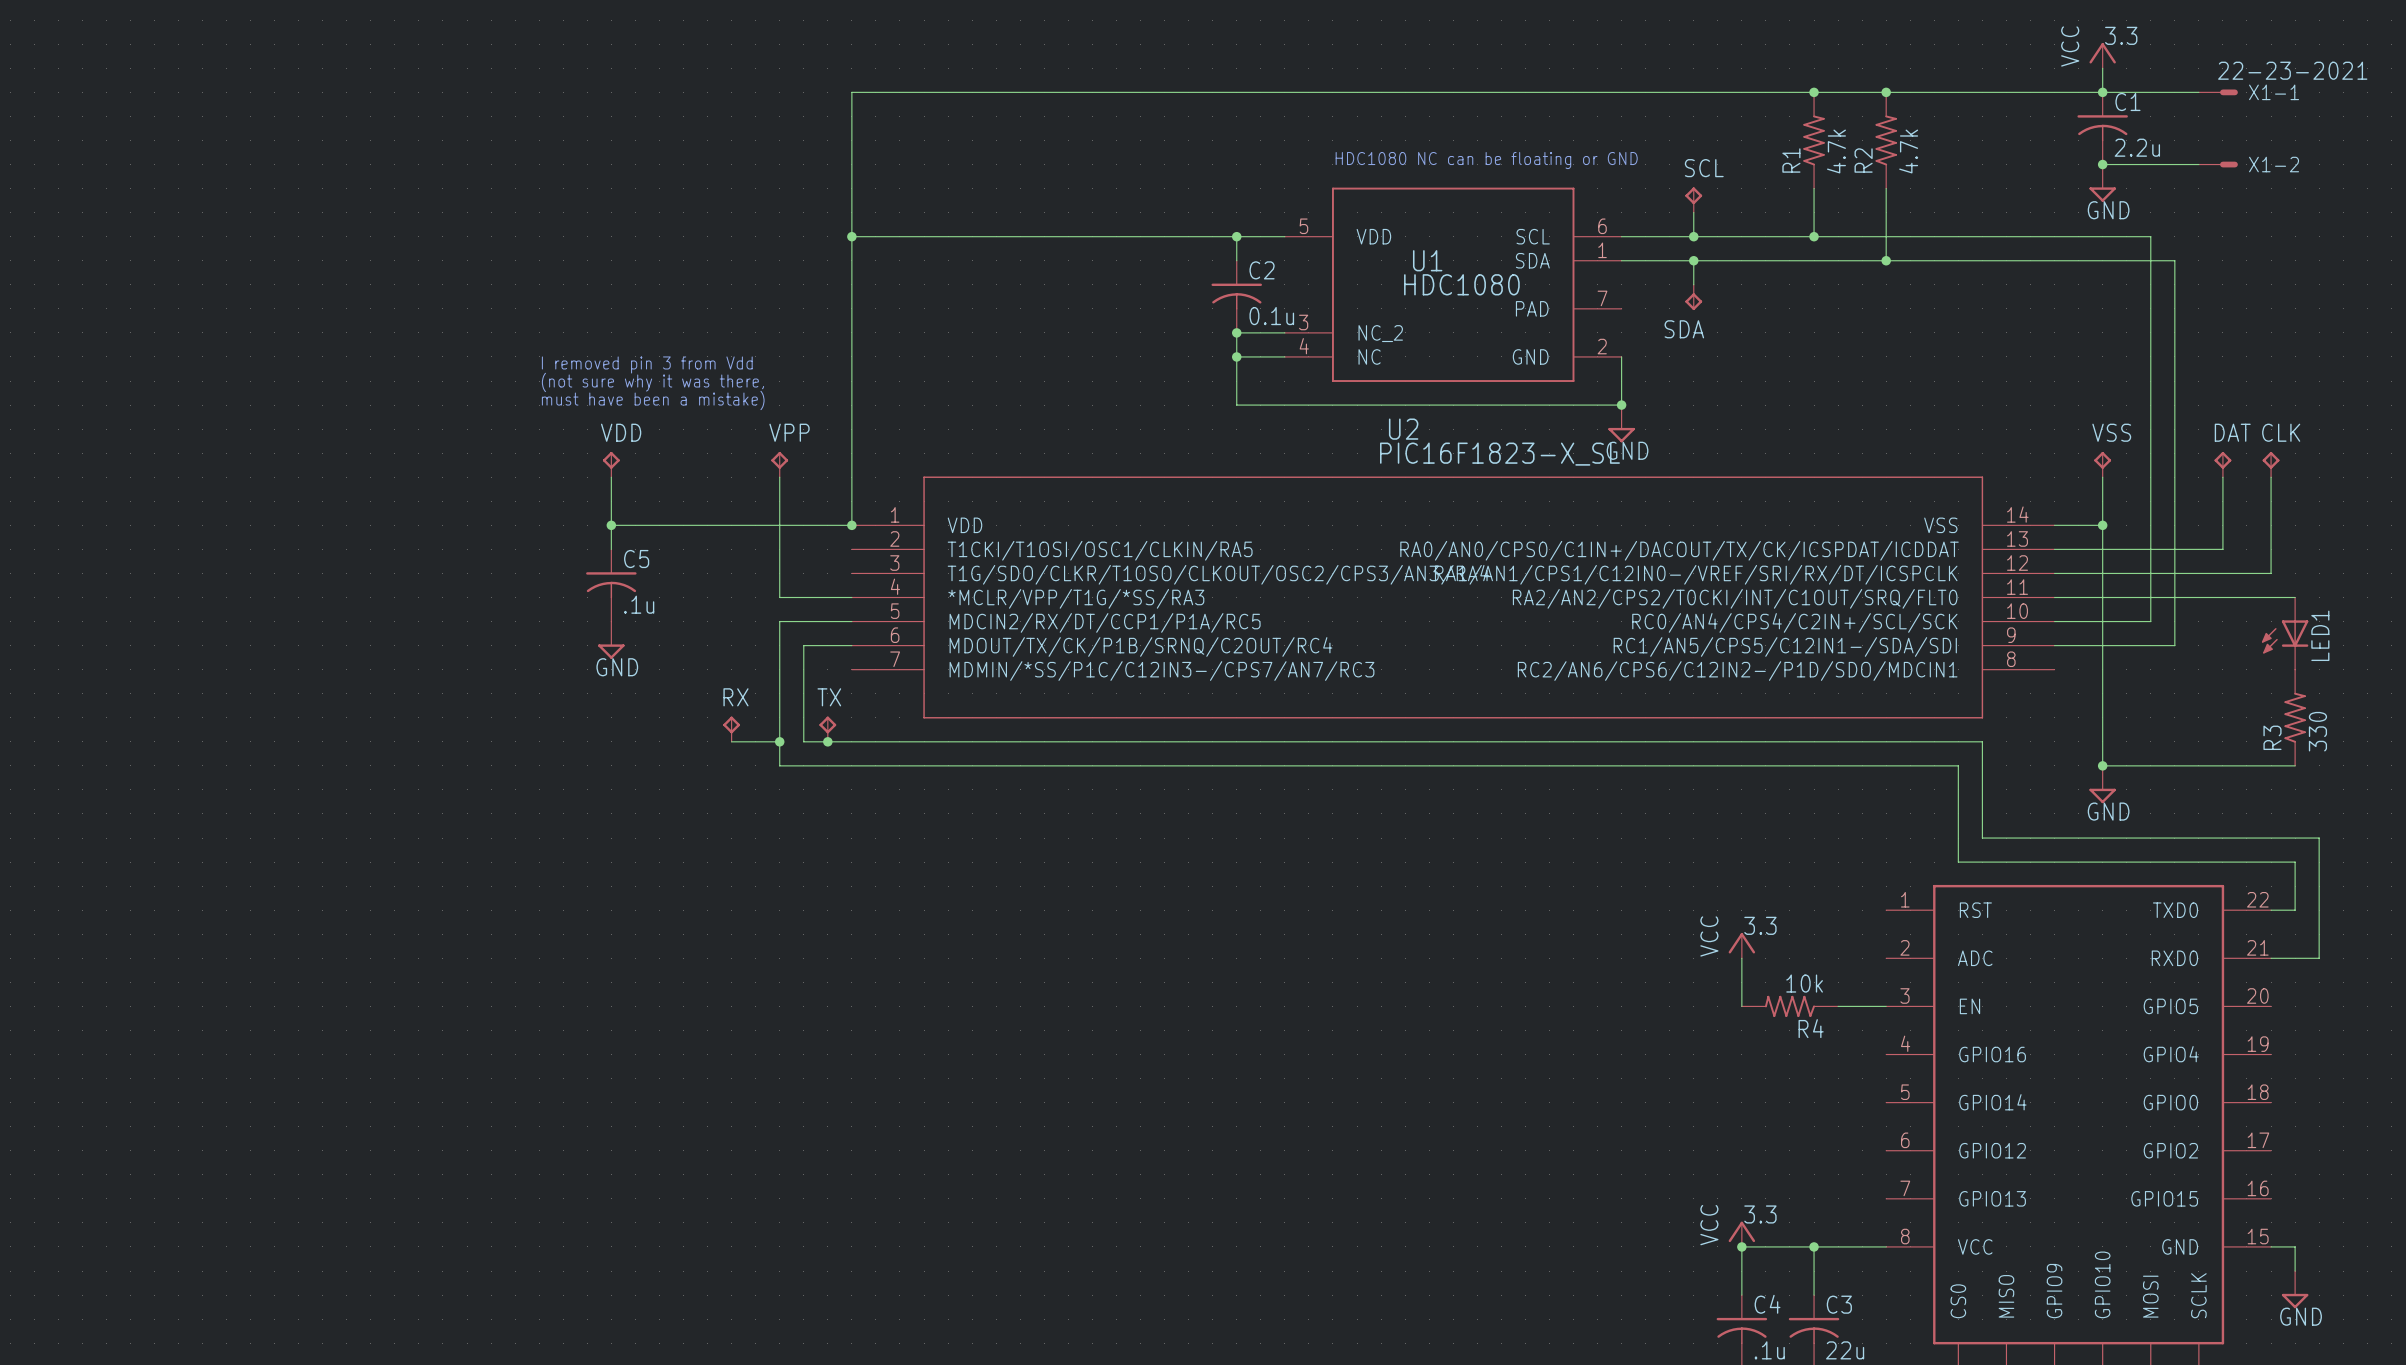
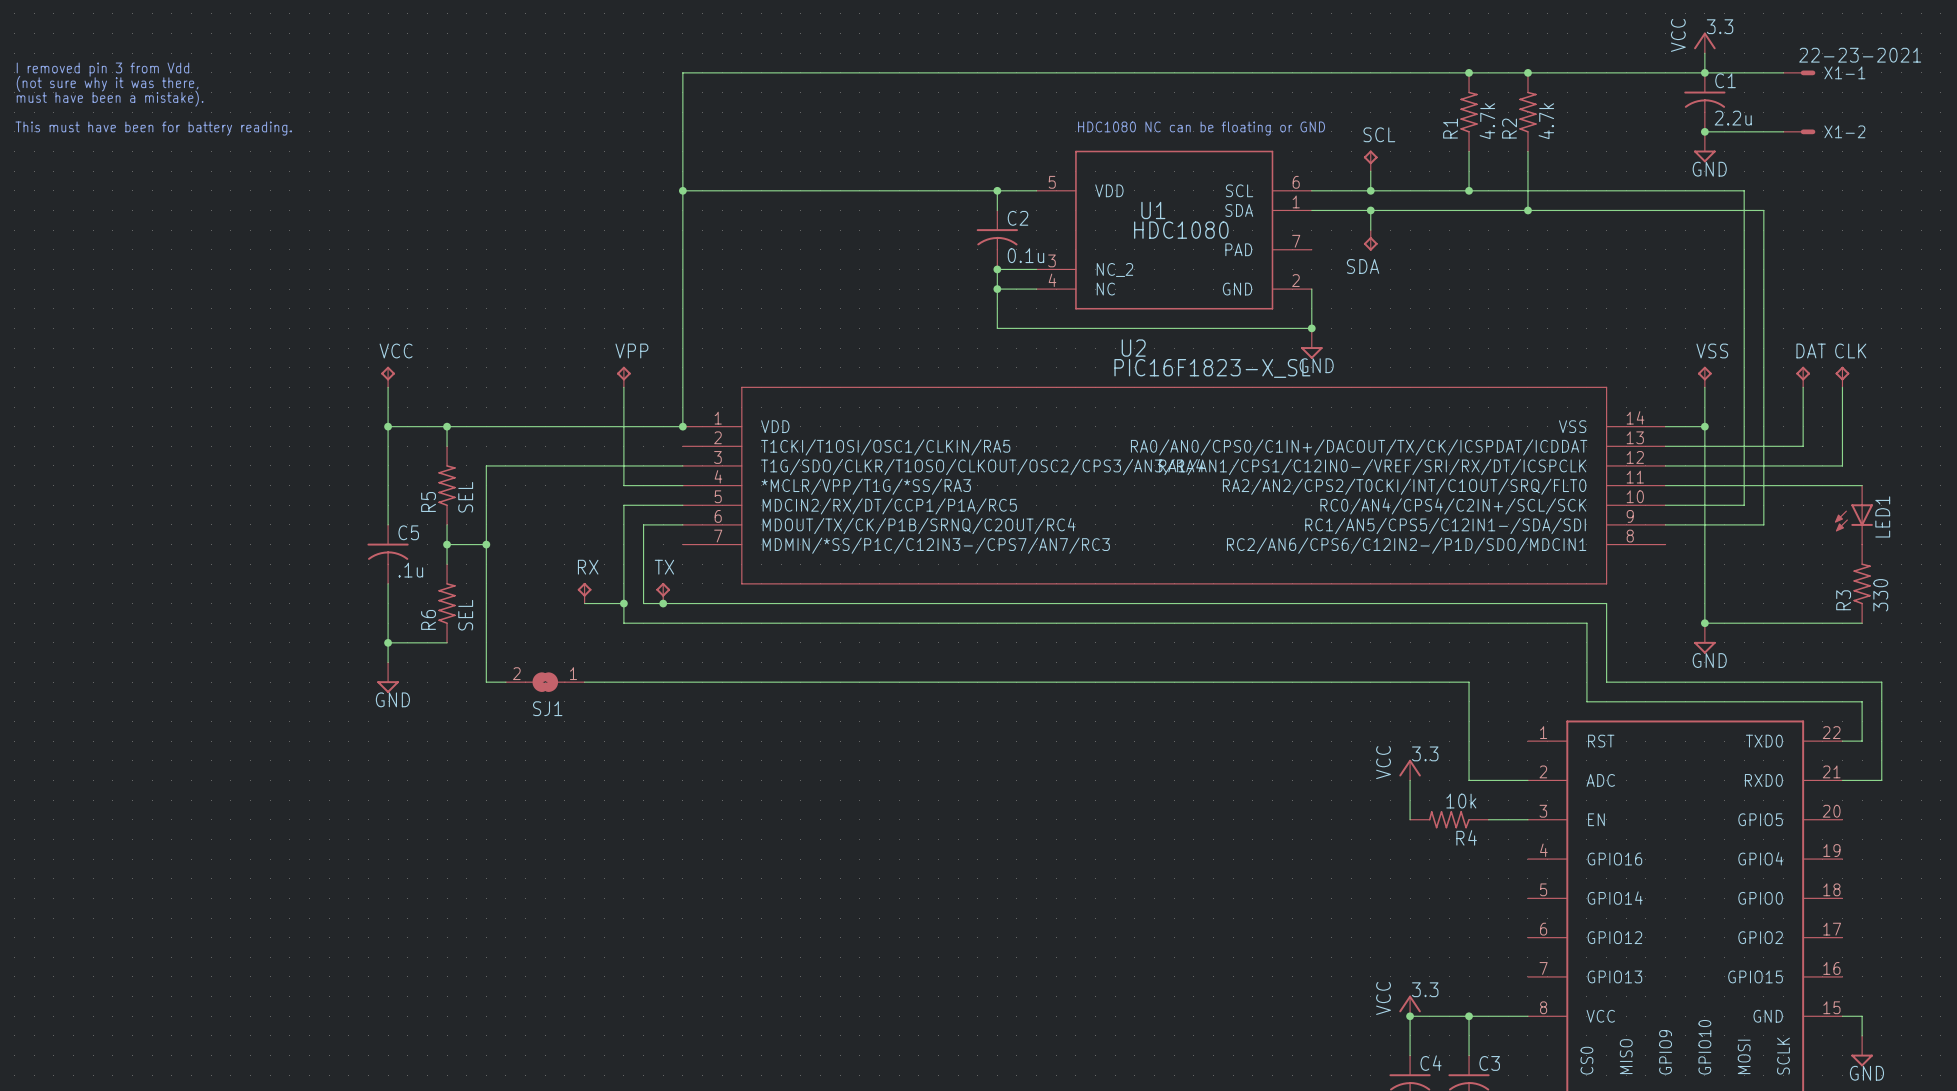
text: none -> I removed pin 3 from Vdd (102, 69)
text: none -> (not sure why it was there, (107, 83)
text: none -> must have been a mistake). (110, 98)
text: none -> This must have been for battery reading. (153, 128)
text: I removed pin 3 from Vdd (647, 364) -> none
text: (not sure why it was there, (652, 382) -> none
text: must have been a mistake) (653, 400) -> none
VCC: none -> (388, 377)
VDD: (611, 464) -> none
wire: none -> (388, 387) (388, 524)
wire: (611, 477) (611, 549) -> none
wire: none -> (388, 426) (486, 426)
junction: none -> (388, 426)
wire: none -> (447, 426) (447, 446)
junction position: (611, 525) -> (447, 426)
wire: none -> (682, 465) (486, 465) (486, 682) (505, 682)
C5 position: (611, 585) -> (388, 554)
R5: none -> SEL (447, 485)
power symbol position: GND (611, 640) -> GND (388, 677)
wire: none -> (447, 524) (447, 564)
wire: none -> (447, 544) (486, 544)
junction: none -> (447, 544)
junction: none -> (486, 544)
wire: none -> (388, 583) (388, 662)
R6: none -> SEL (447, 603)
wire: none -> (388, 642) (447, 642)
junction: none -> (388, 642)
SJ1: none -> (545, 682)
wire: none -> (584, 682) (1469, 682) (1469, 780) (1527, 780)

